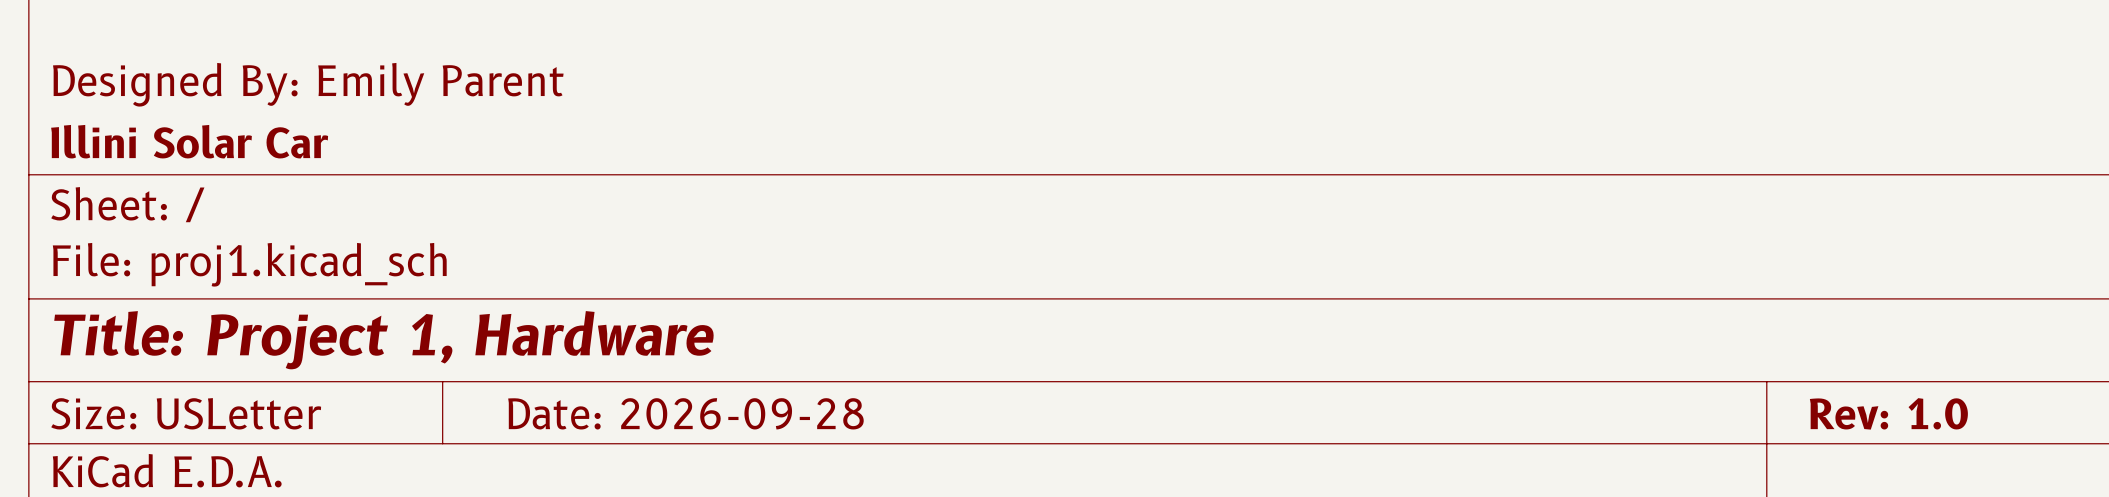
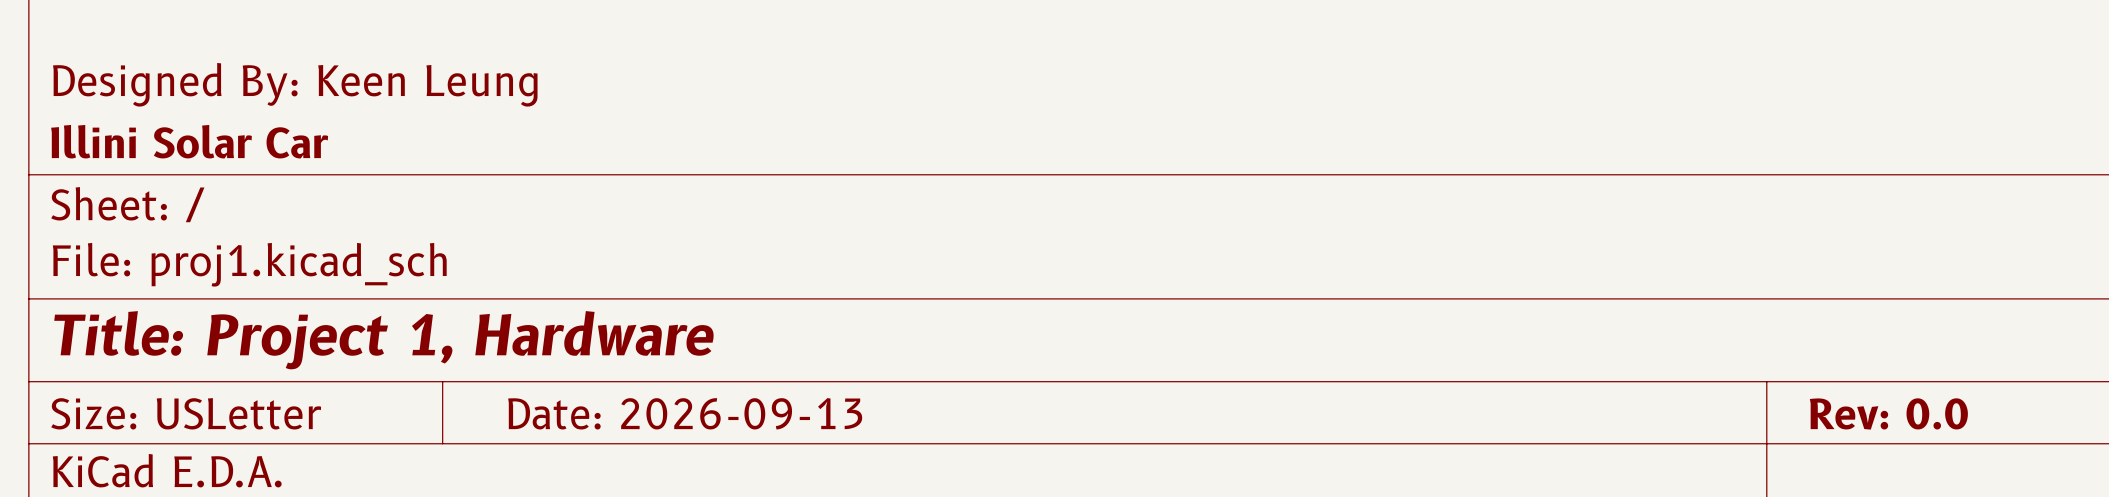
title block: Designed By: Emily Parent (308, 84) -> Designed By: Keen Leung (295, 84)
title block: Date: 2026-09-28 (685, 413) -> Date: 2026-09-13 (685, 413)
title block: Rev: 1.0 (1888, 413) -> Rev: 0.0 (1888, 413)

